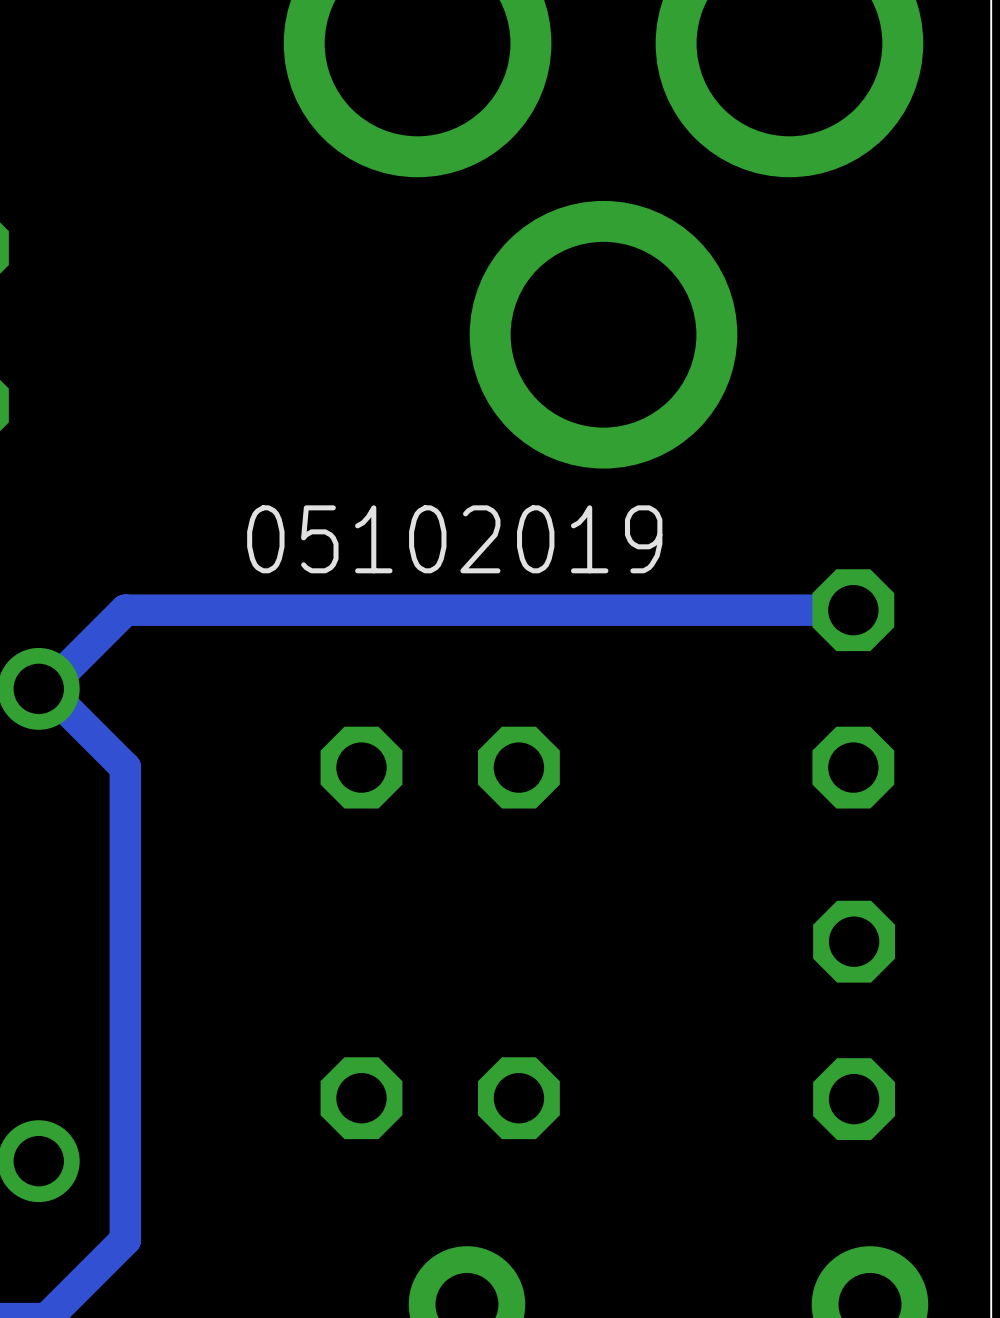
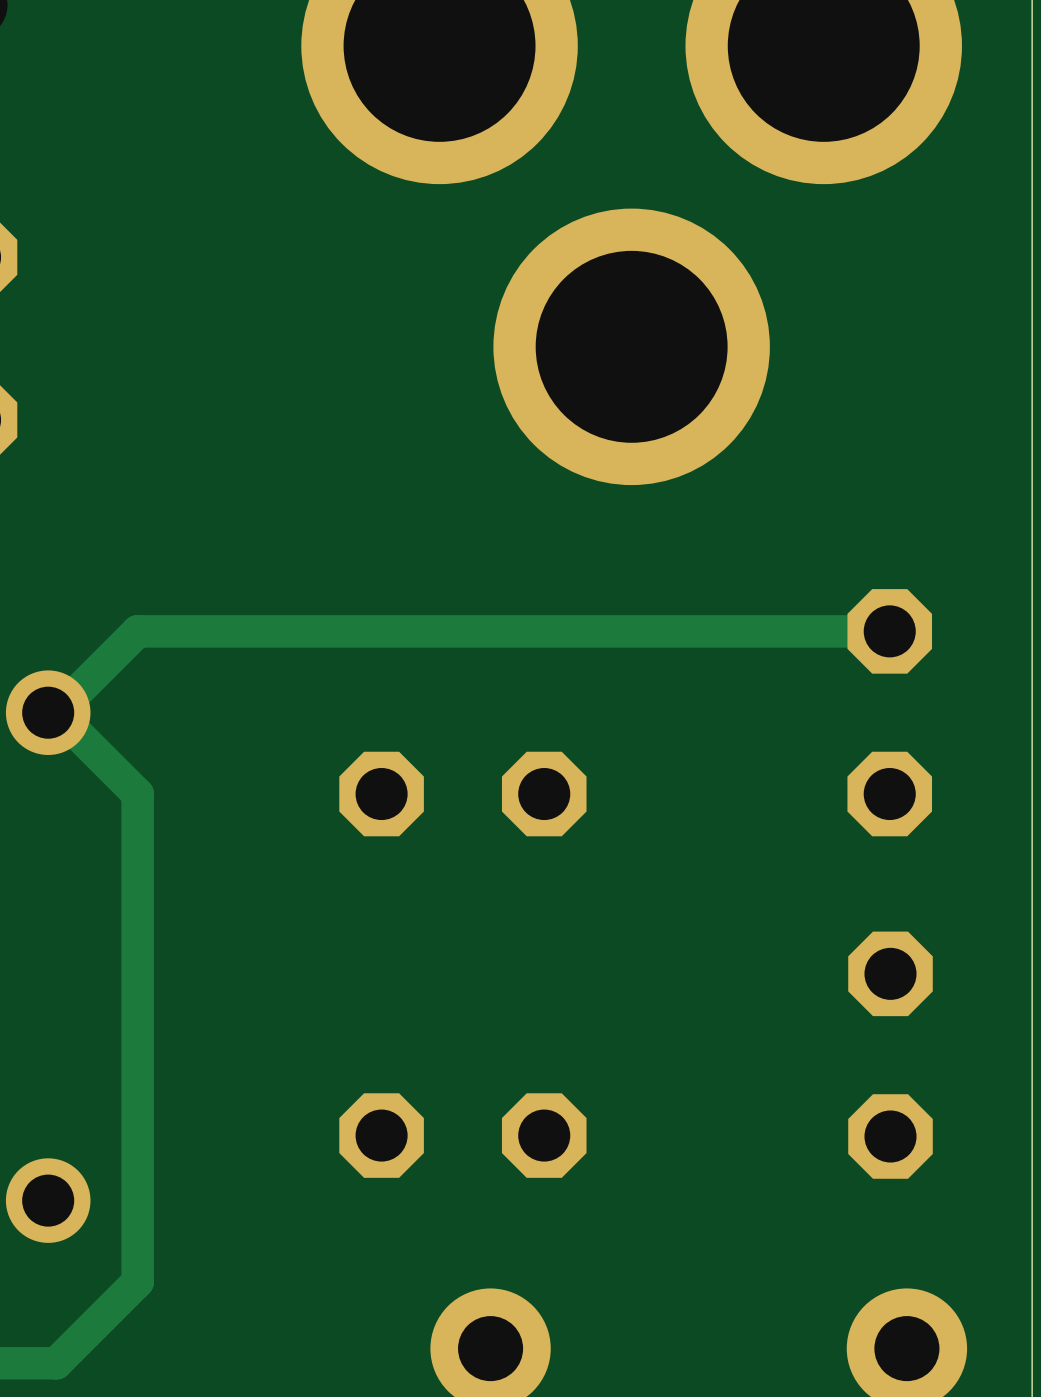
text: 05102019 (454, 539) -> none

